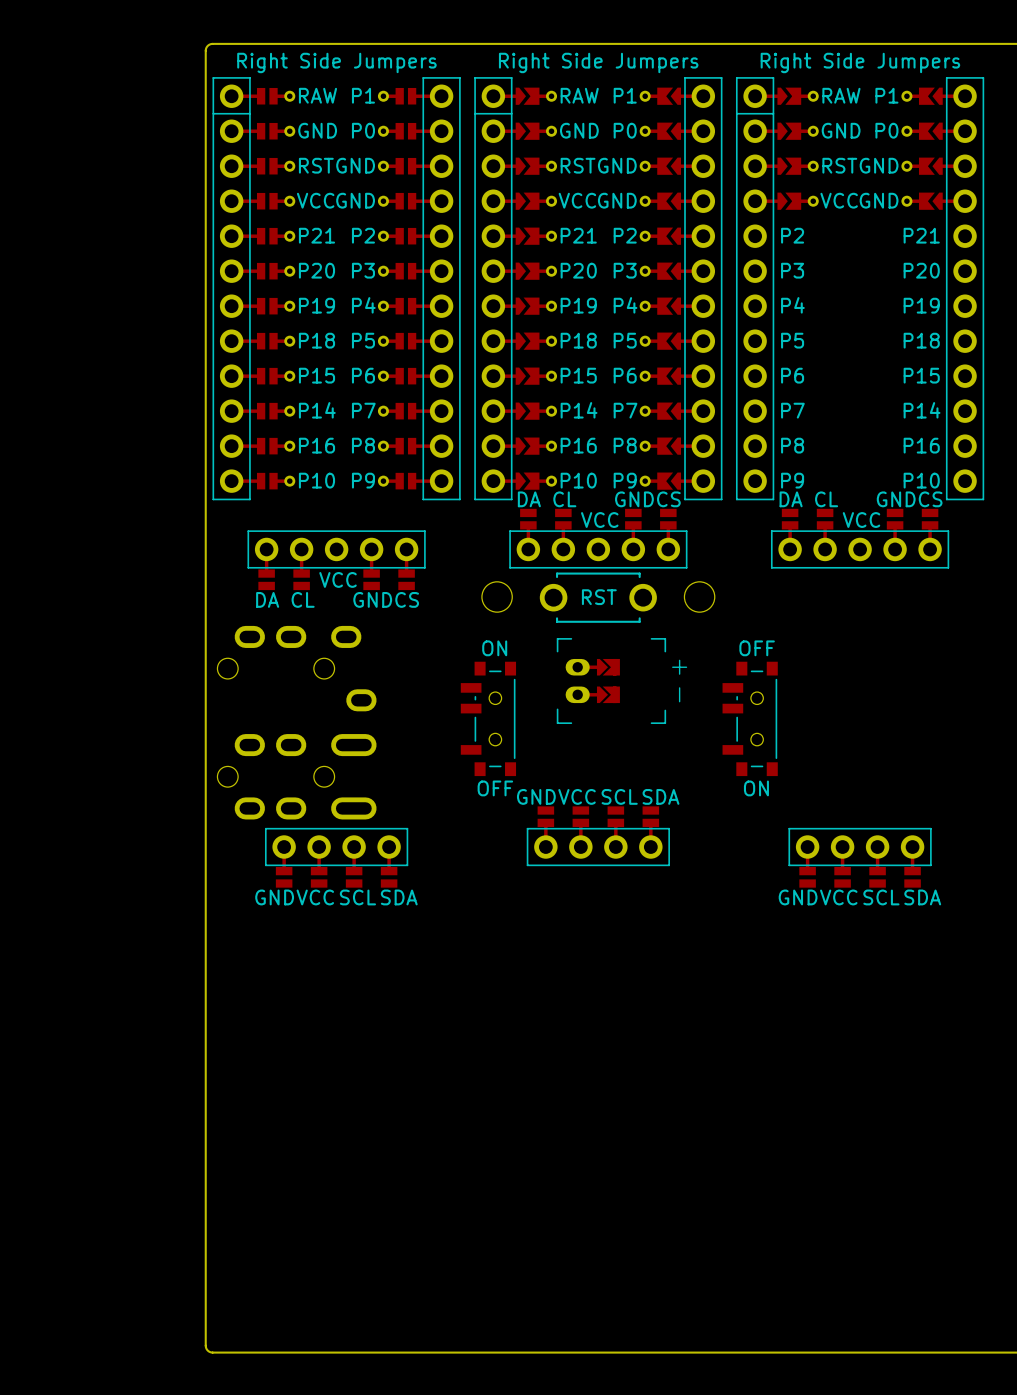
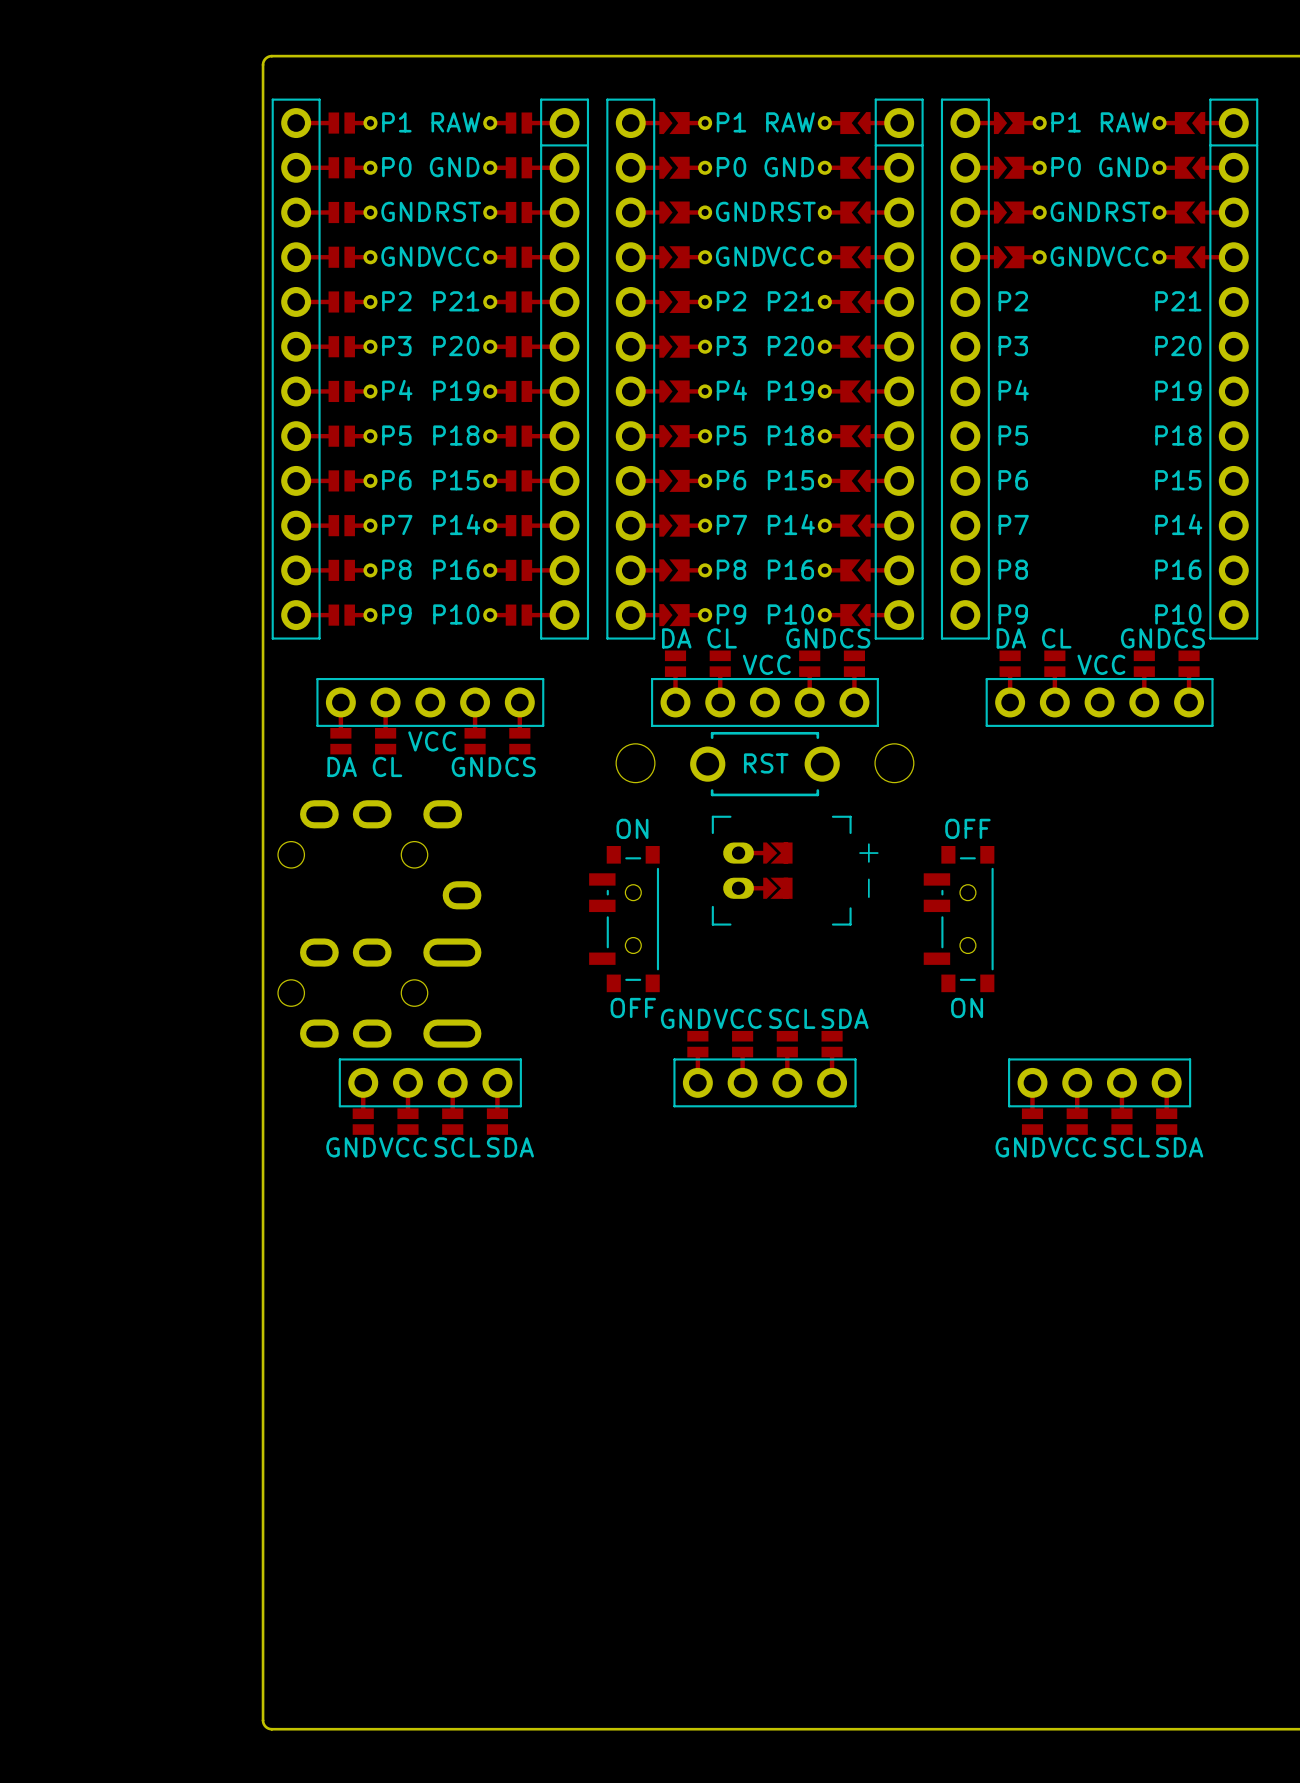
part footprint: [212, 77, 461, 501] -> [271, 98, 590, 640]
part footprint: [474, 77, 723, 501] -> [606, 98, 924, 640]
part footprint: [735, 77, 985, 501] -> [940, 98, 1259, 640]

